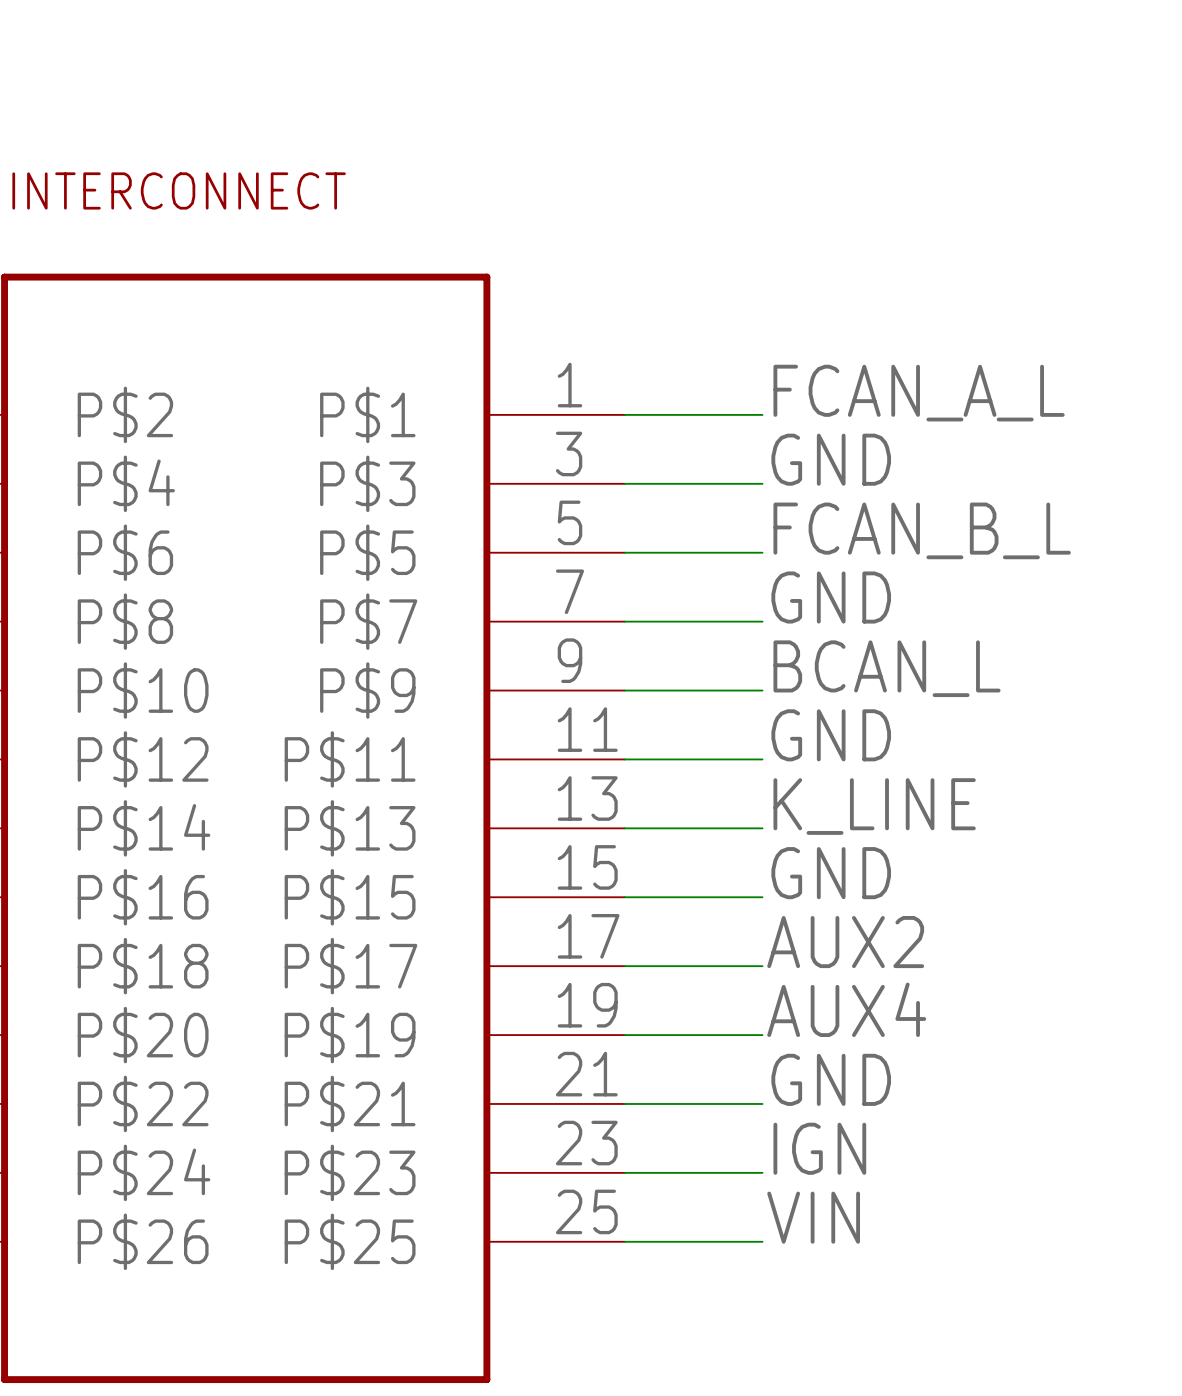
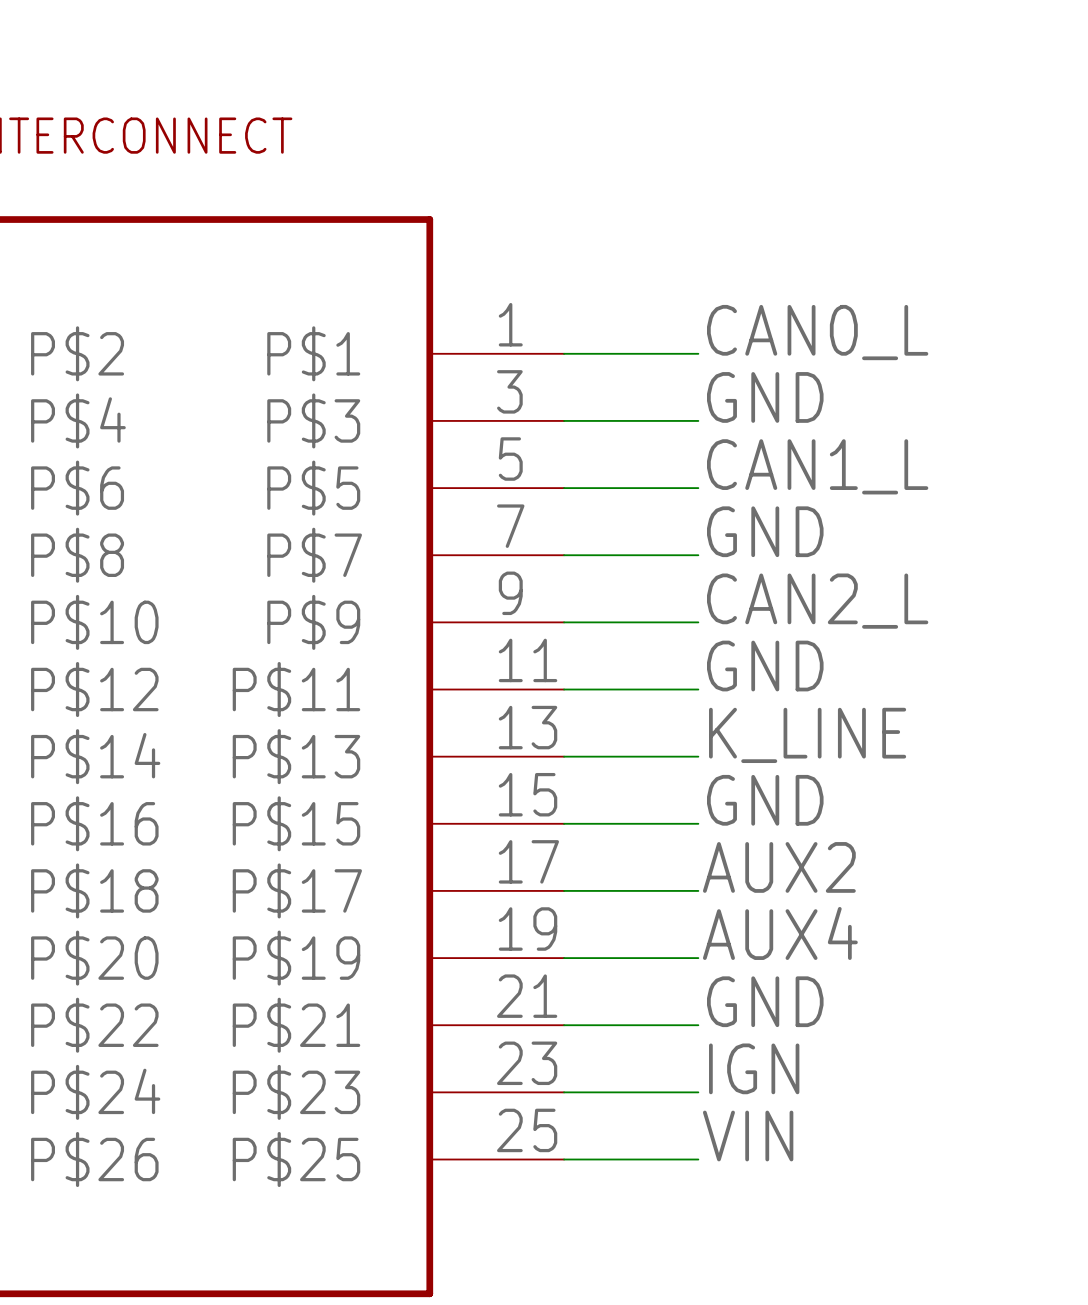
label: FCAN_A_L (919, 393) -> CAN0_L (817, 332)
label: FCAN_B_L (922, 530) -> CAN1_L (817, 466)
label: BCAN_L (887, 668) -> CAN2_L (817, 601)

